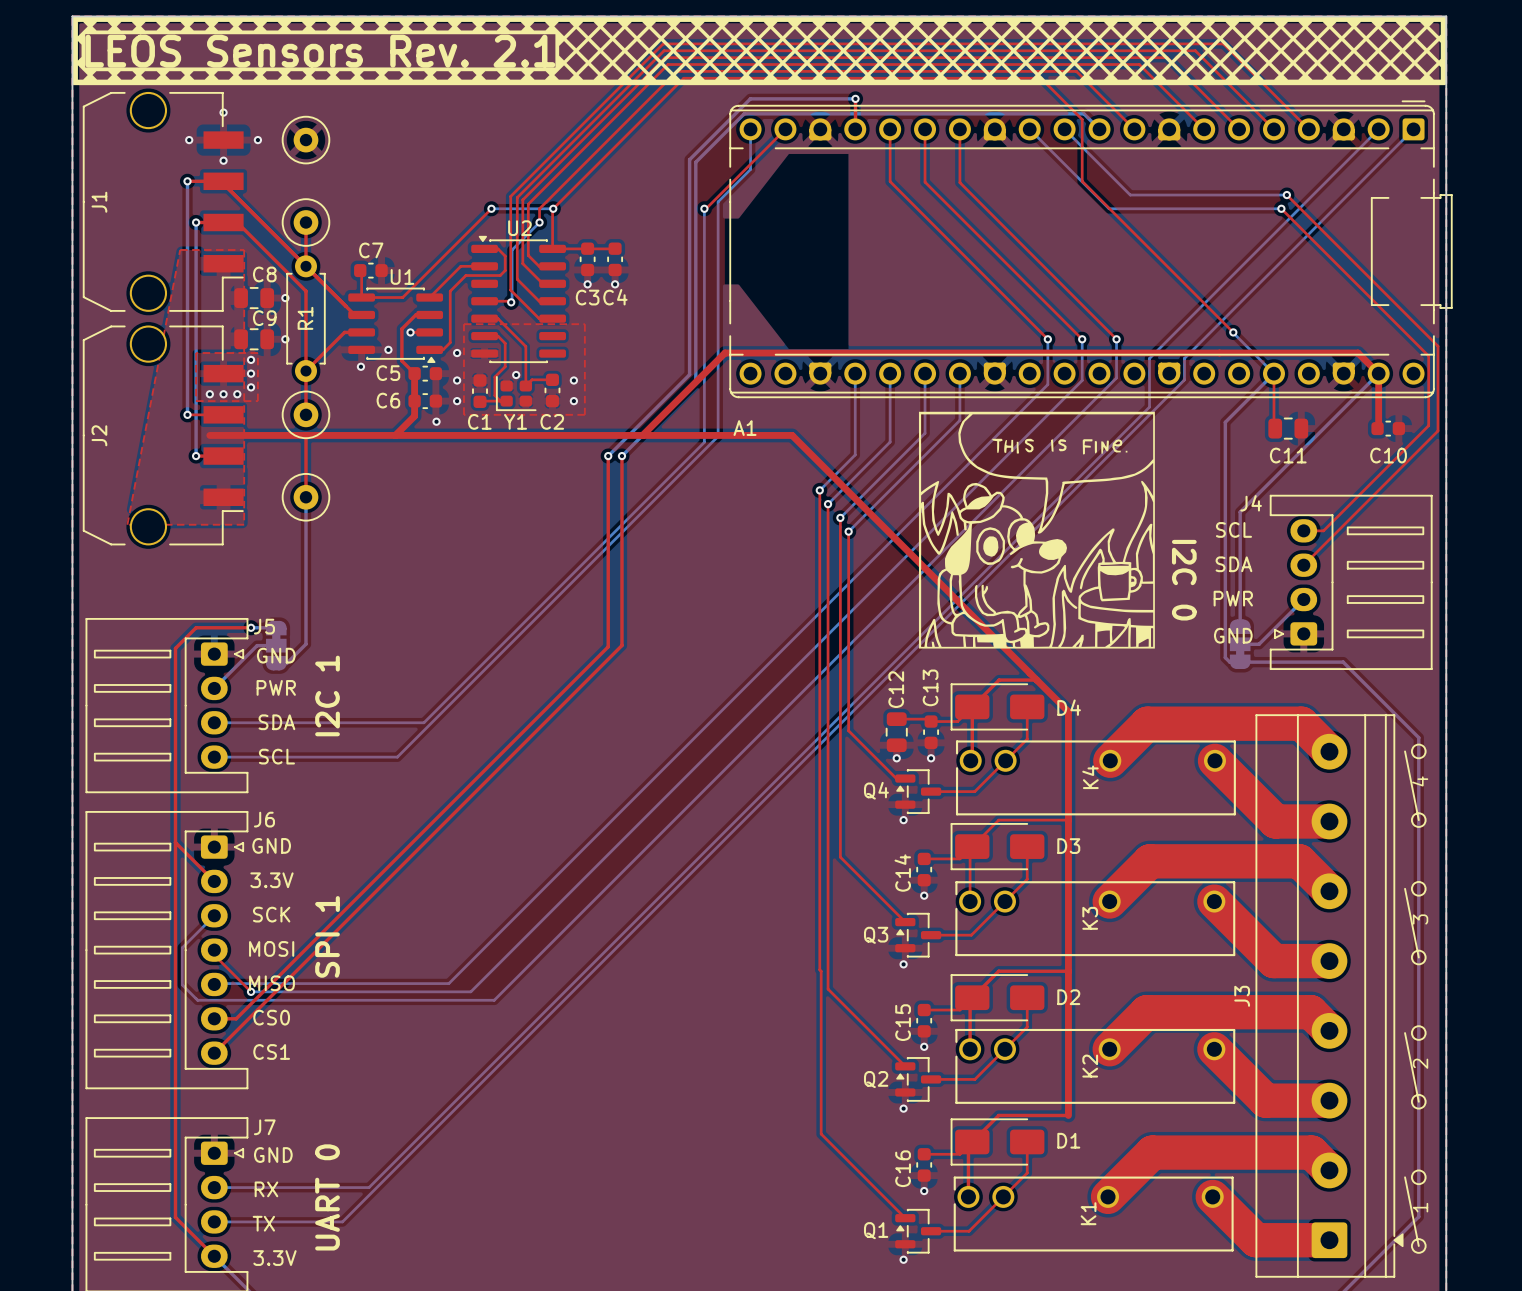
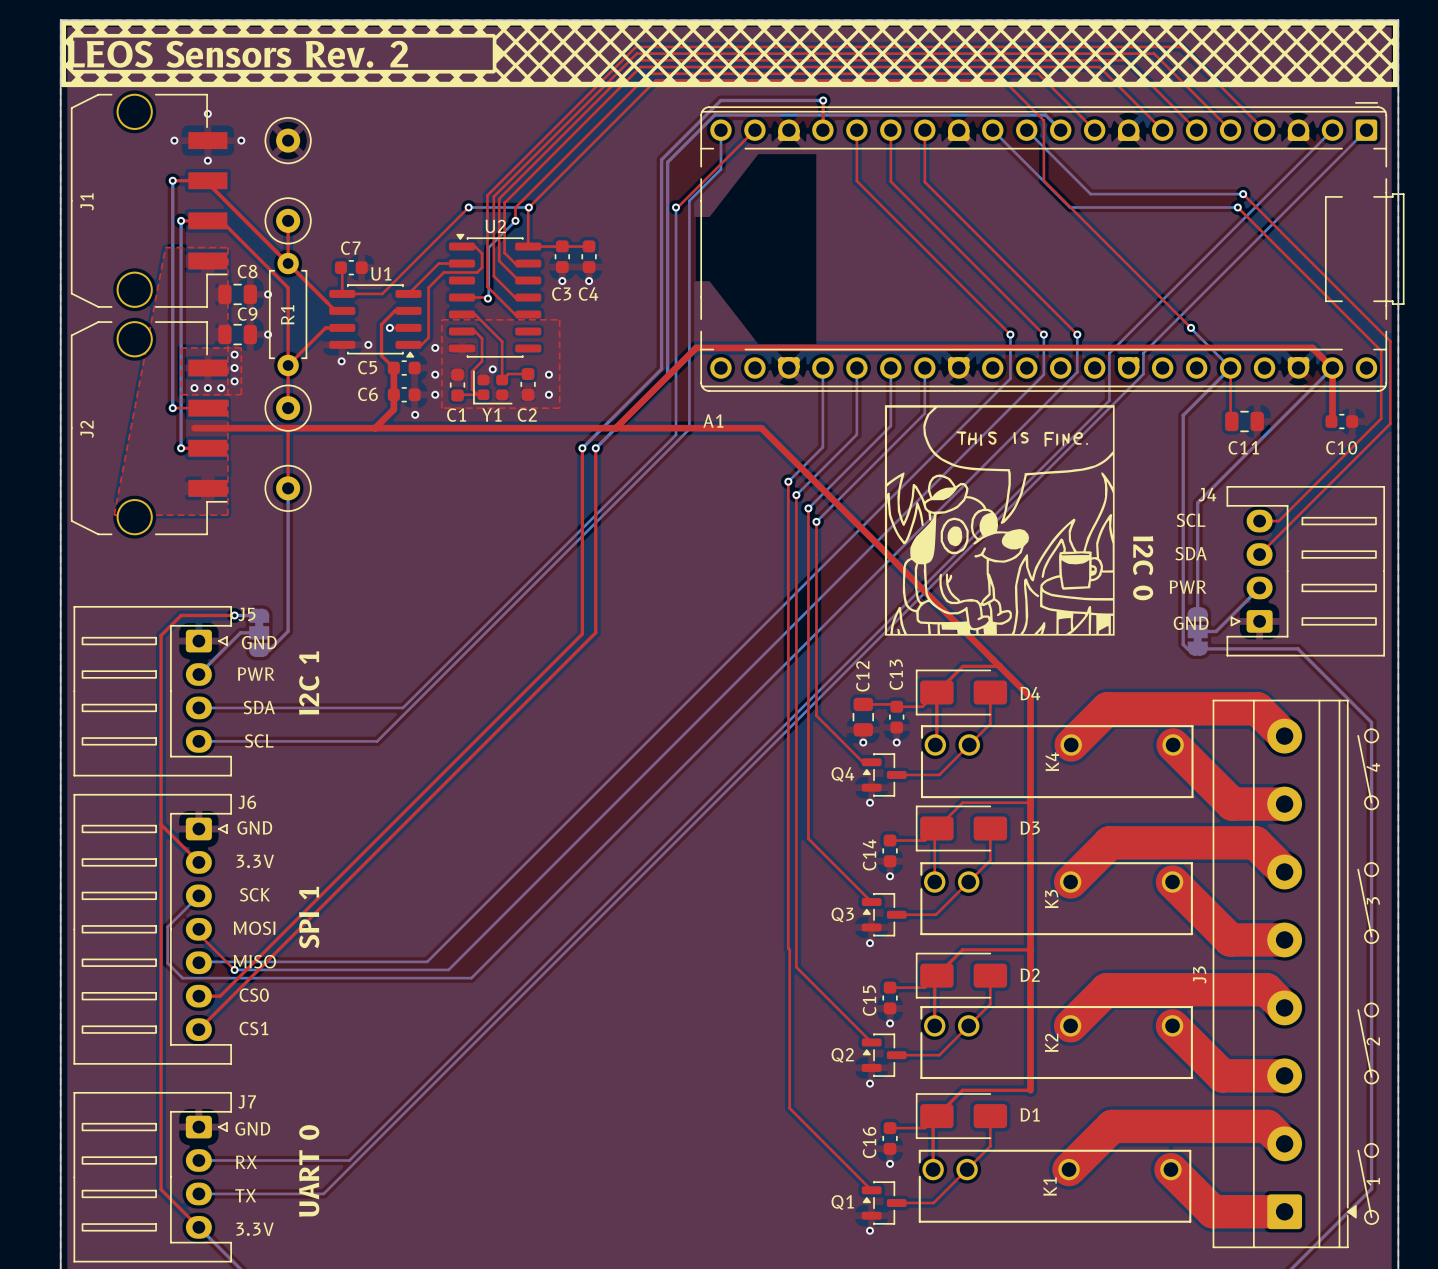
drawing shape: [72, 16, 1447, 86] -> [60, 20, 1399, 88]
text: LEOS Sensors Rev. 2.1 (320, 51) -> LEOS Sensors Rev. 2 (237, 54)

